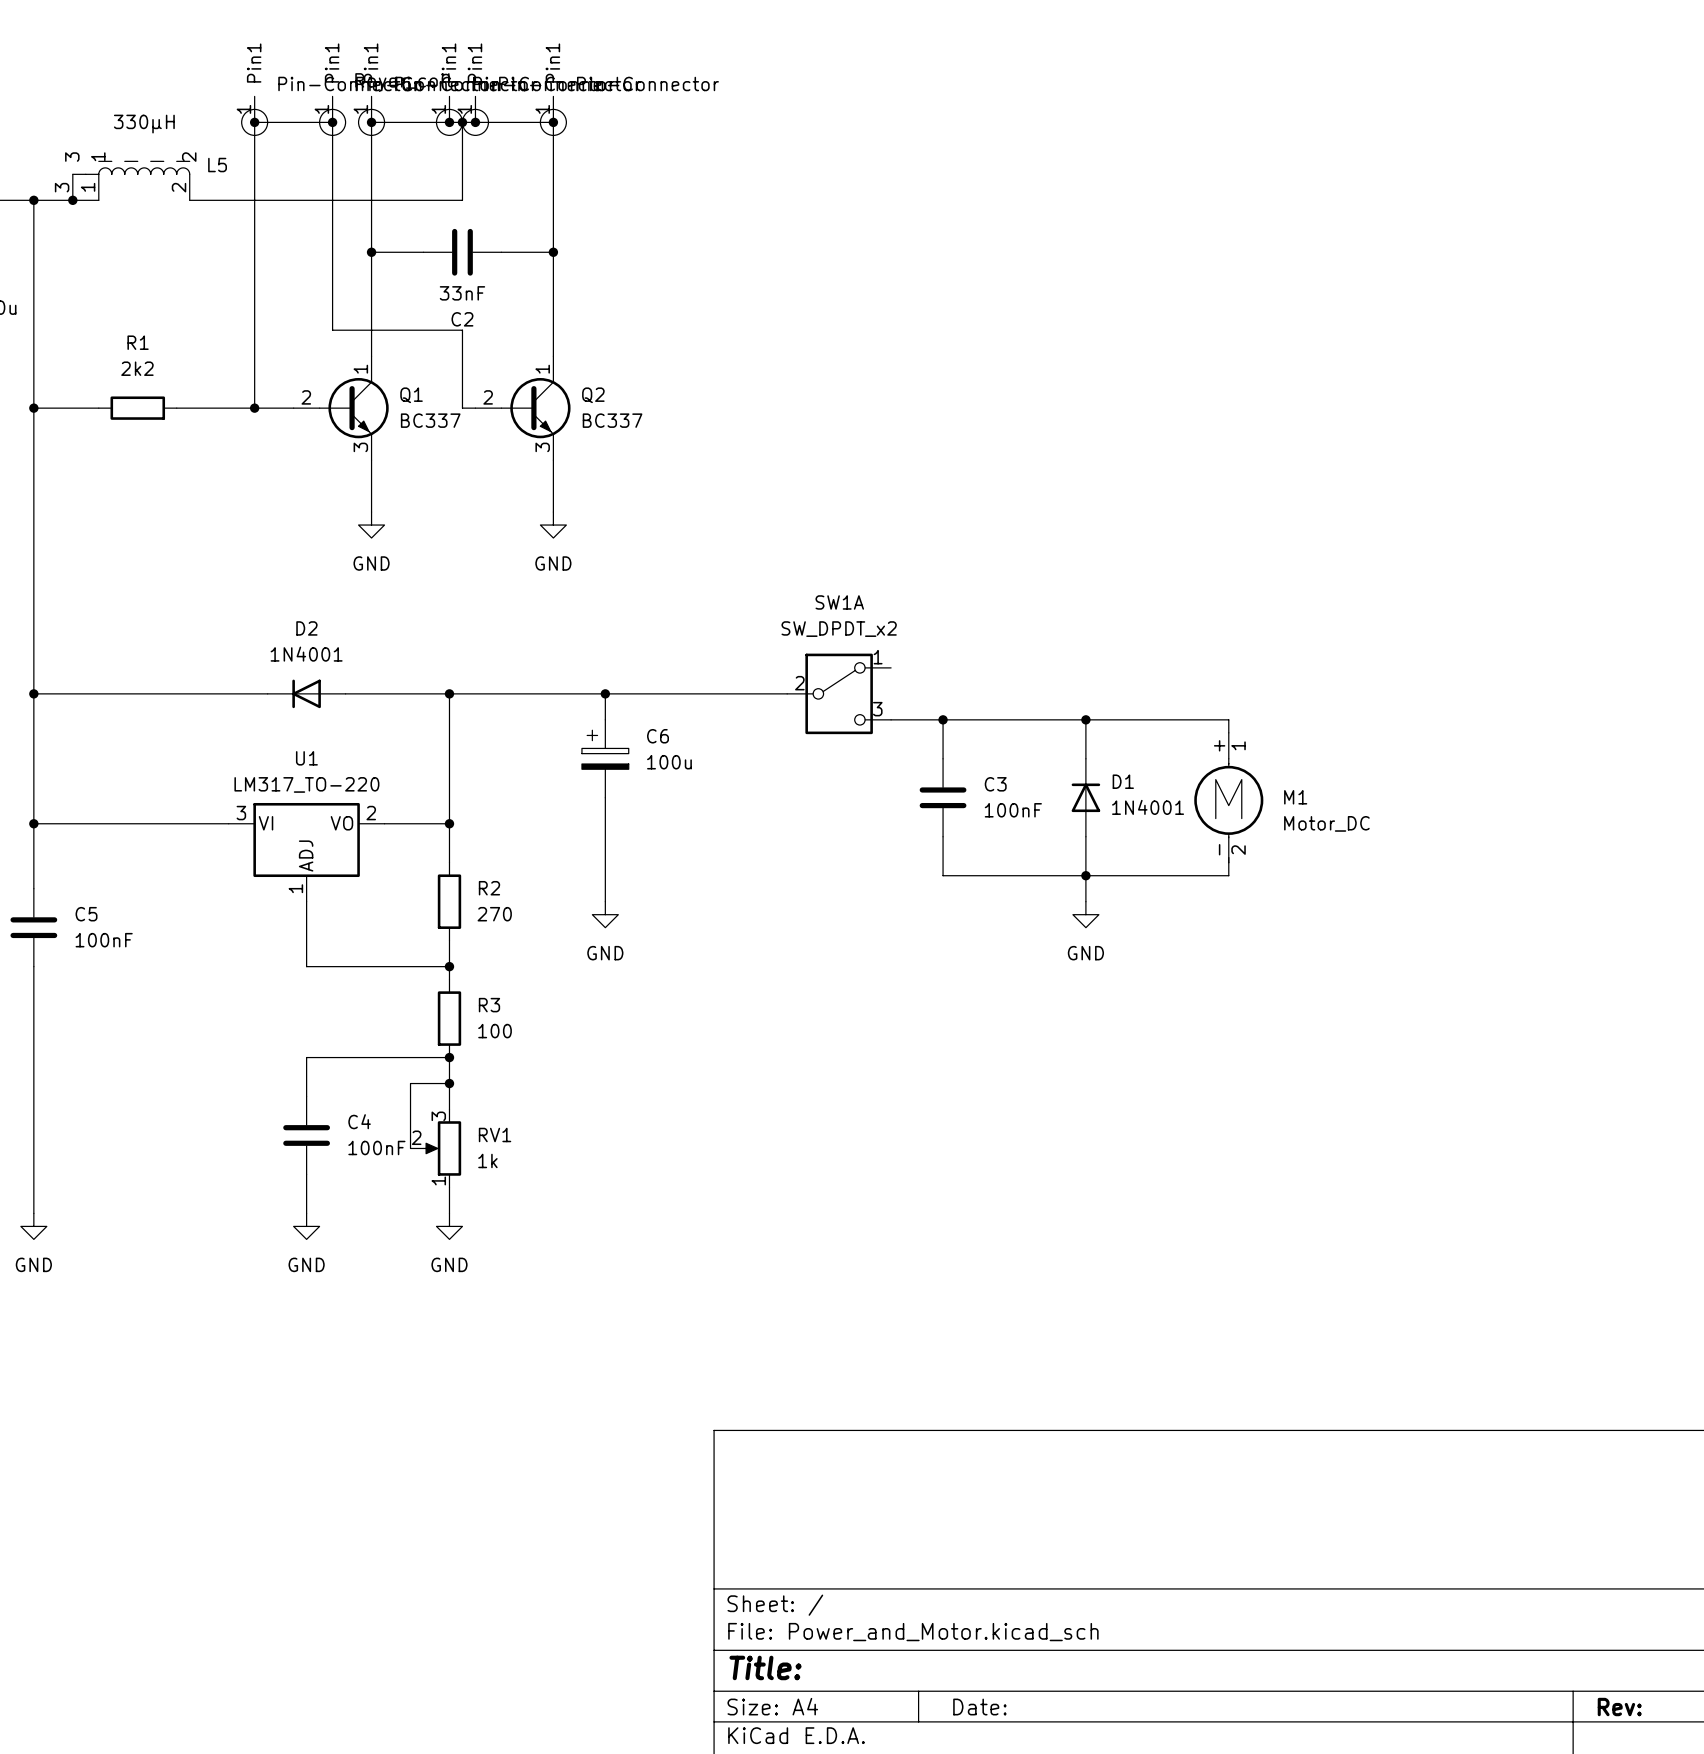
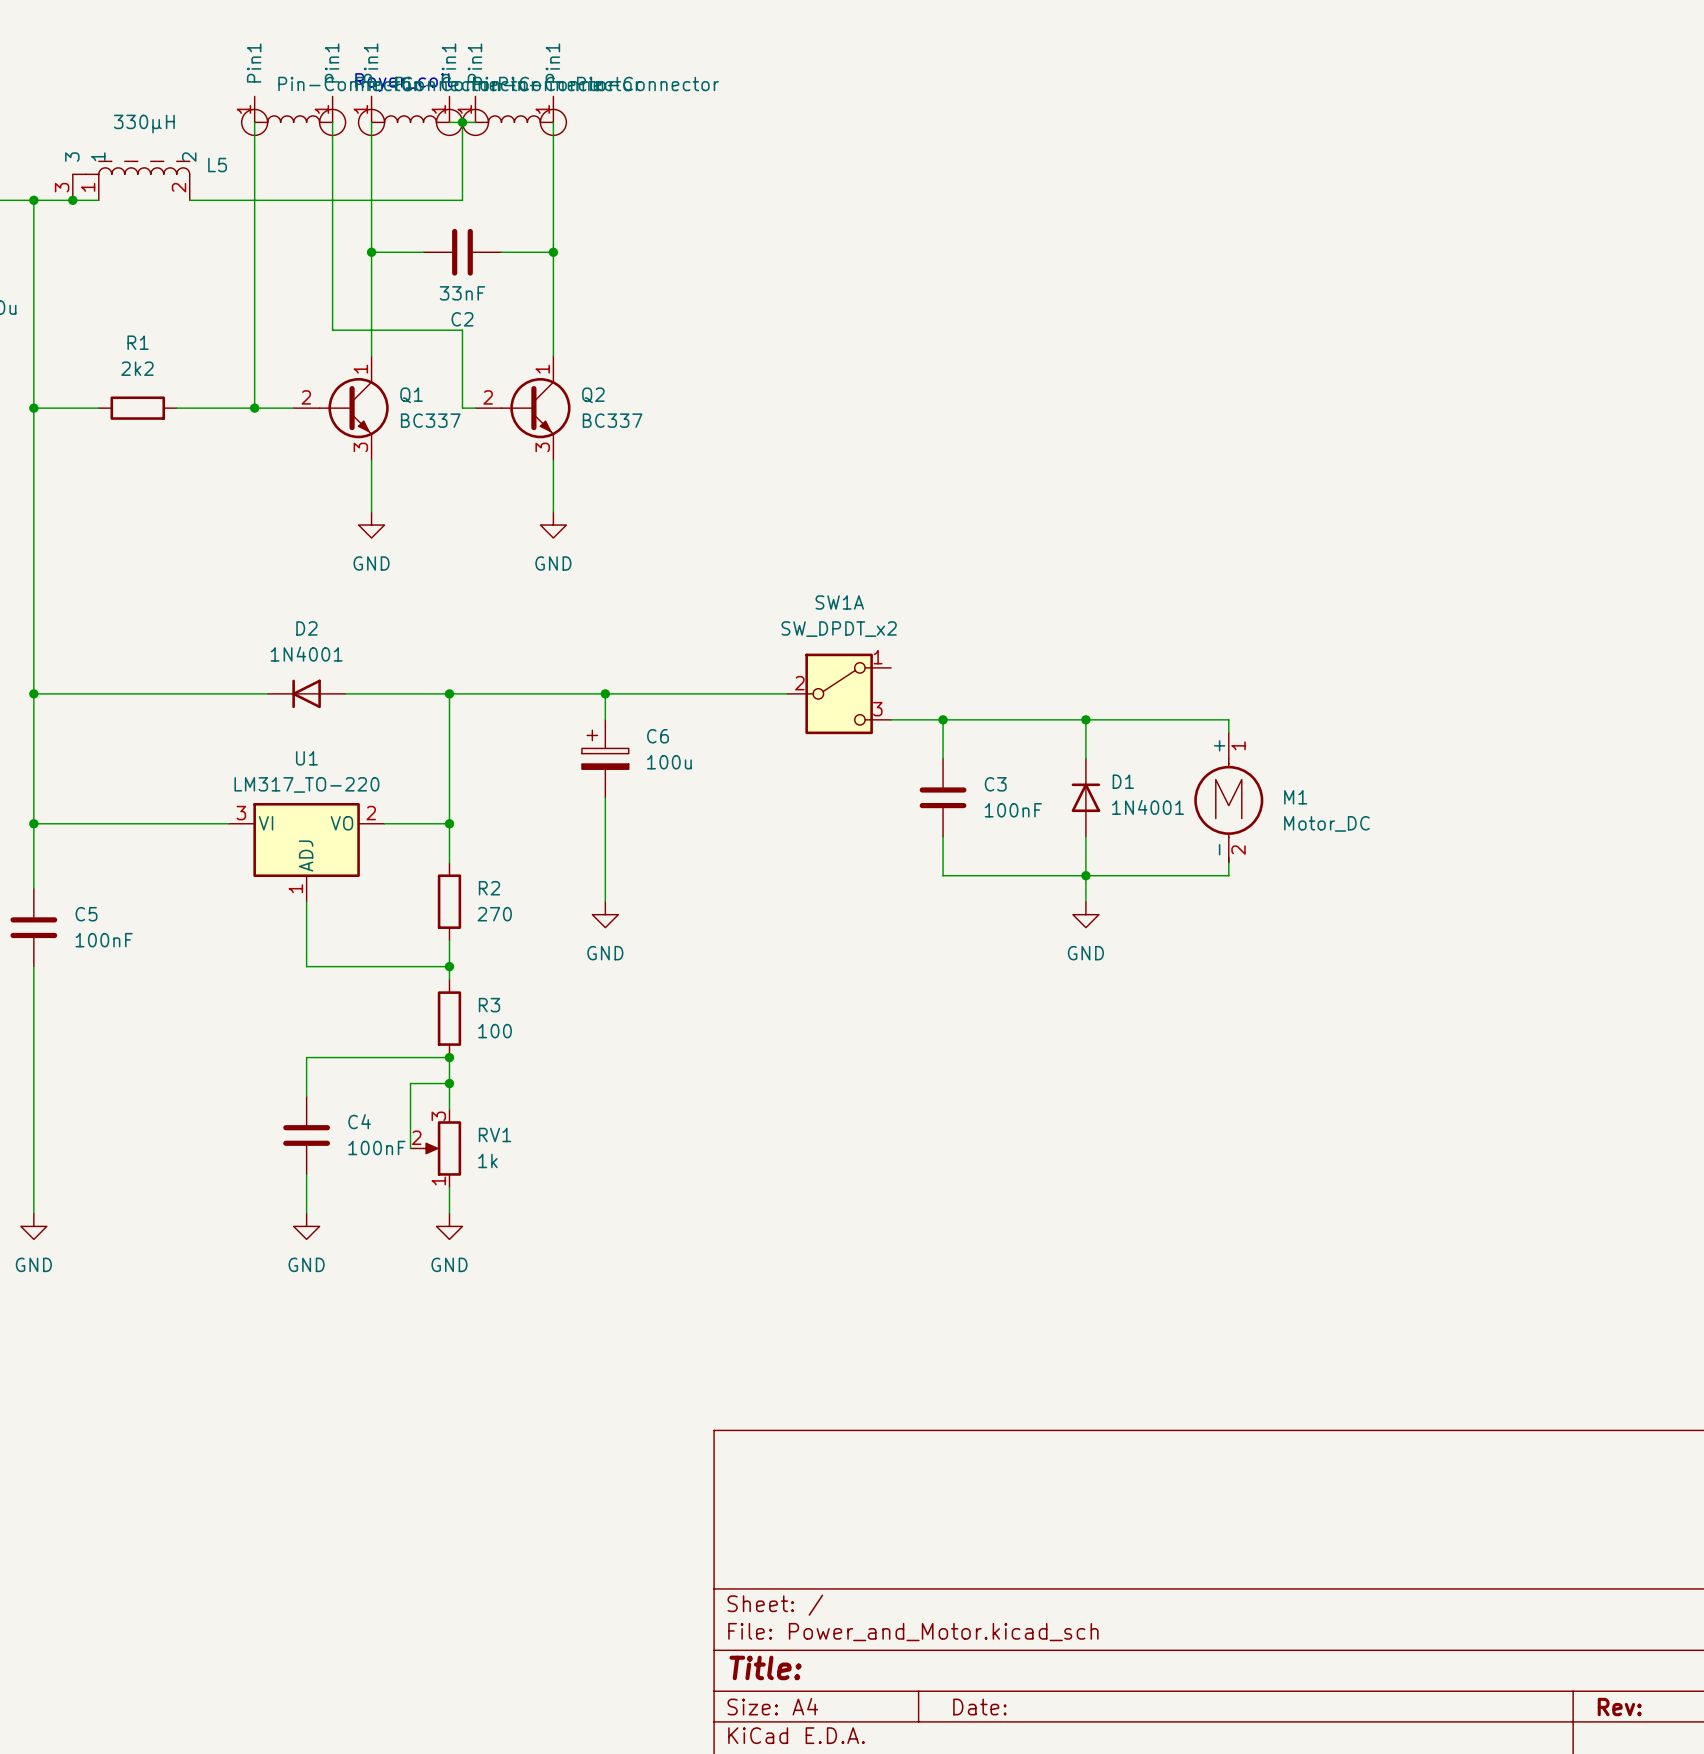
part: none -> (293, 119)
part: none -> (410, 119)
part: none -> (514, 119)
wire: (254, 122) (332, 122) -> none
junction: (254, 122) -> none
junction: (332, 122) -> none
wire: (371, 122) (449, 122) -> none
junction: (371, 122) -> none
junction: (449, 122) -> none
wire: (475, 122) (553, 122) -> none
junction: (475, 122) -> none
junction: (553, 122) -> none

